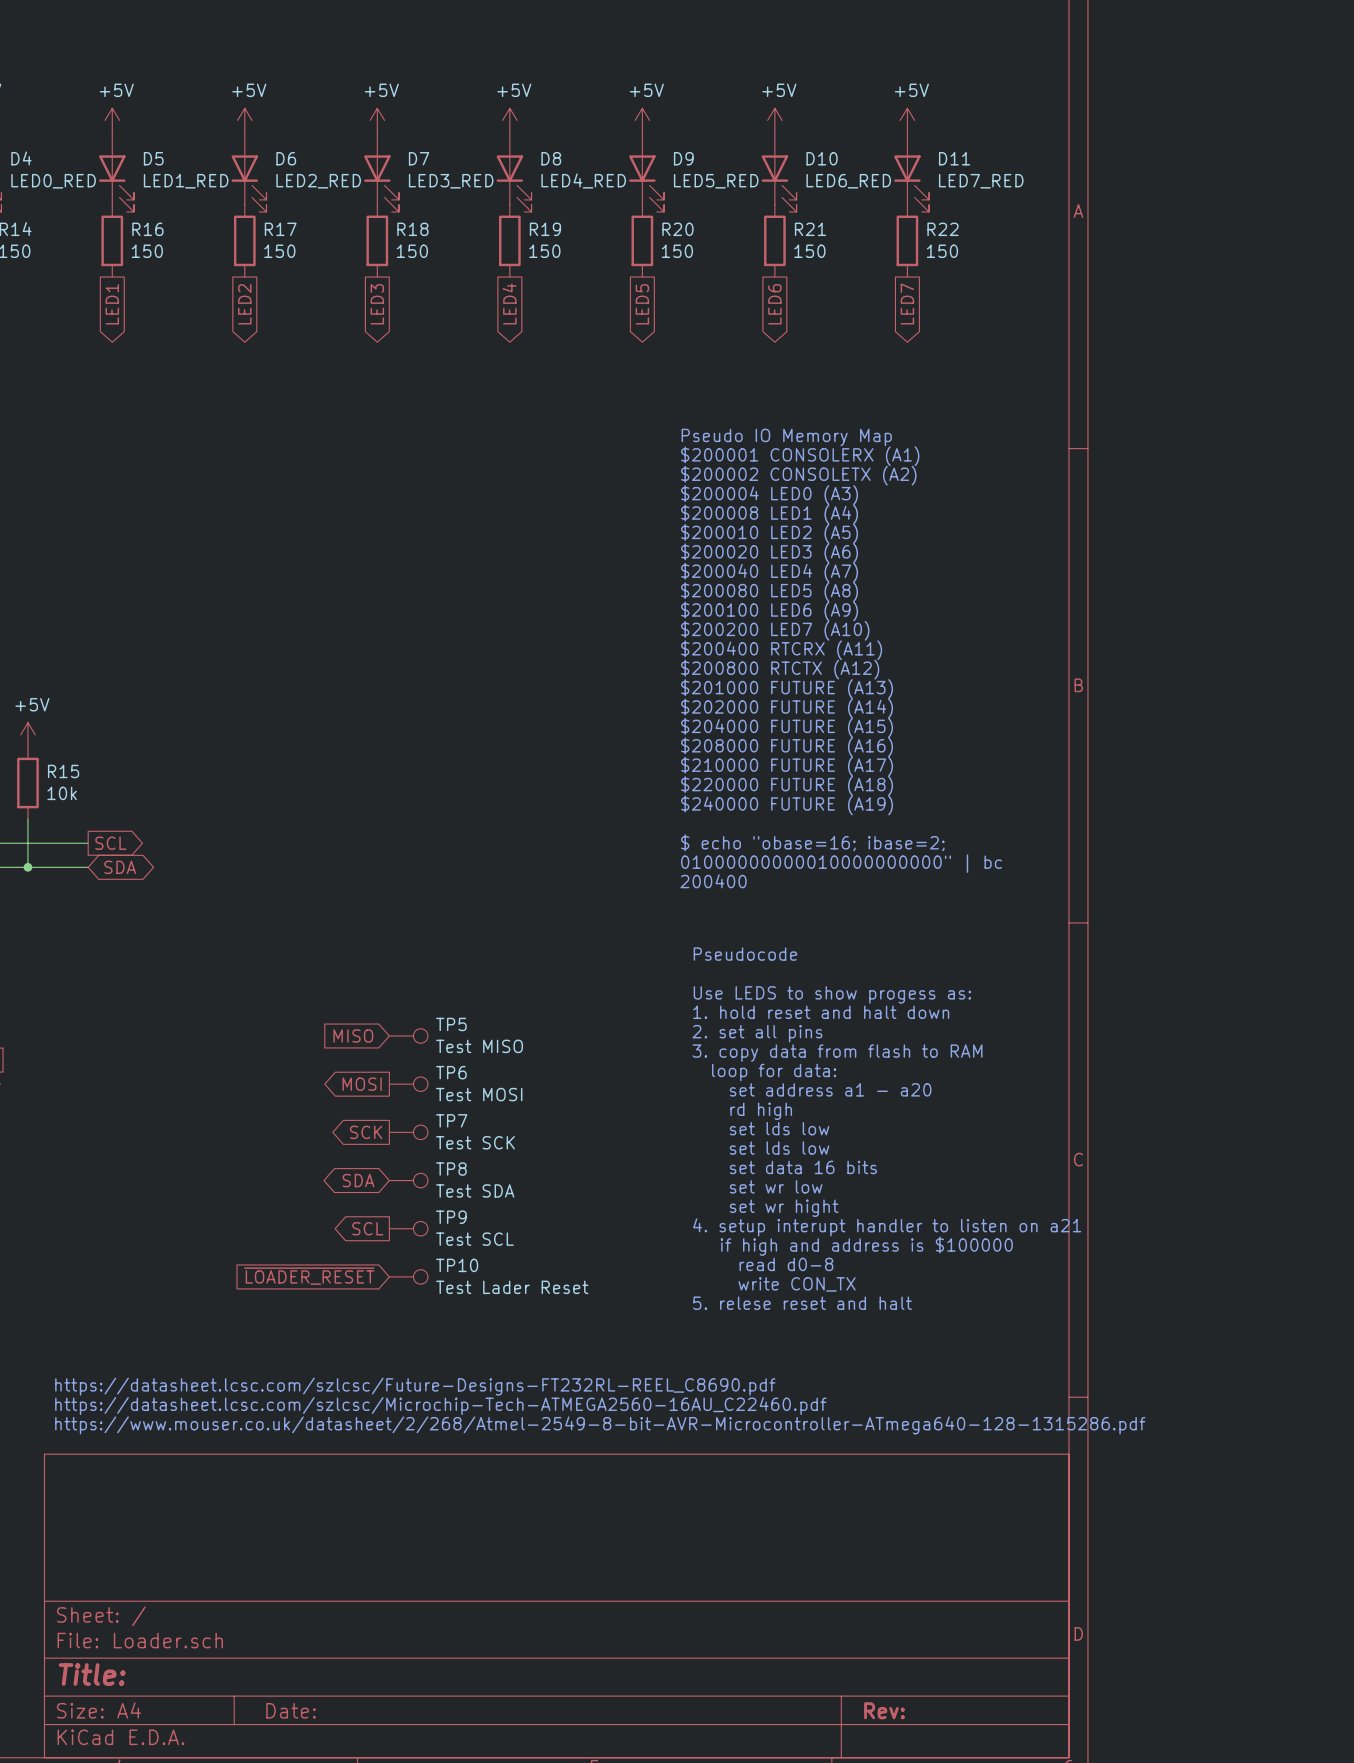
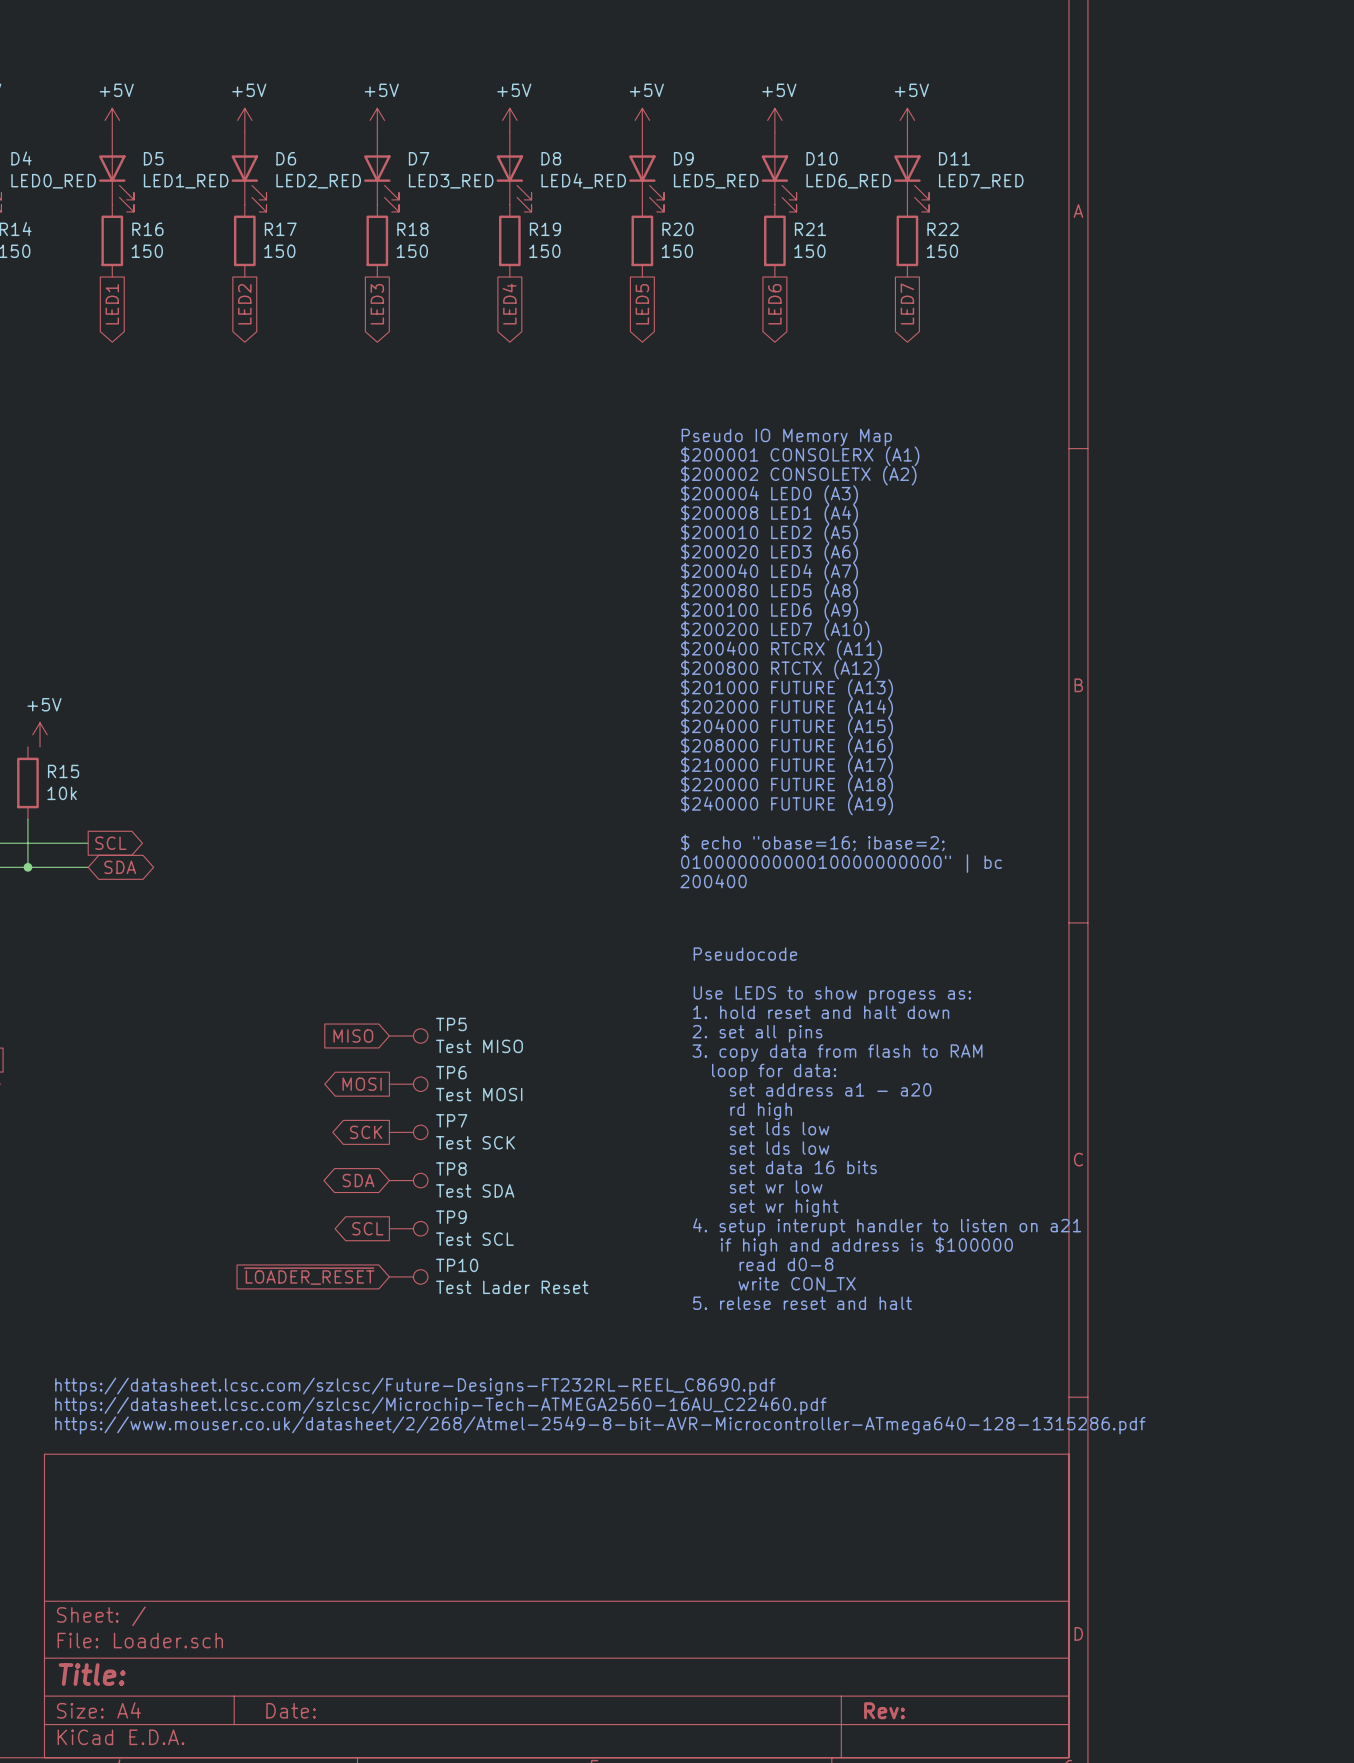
power symbol position: +5V (27, 734) -> +5V (40, 734)

